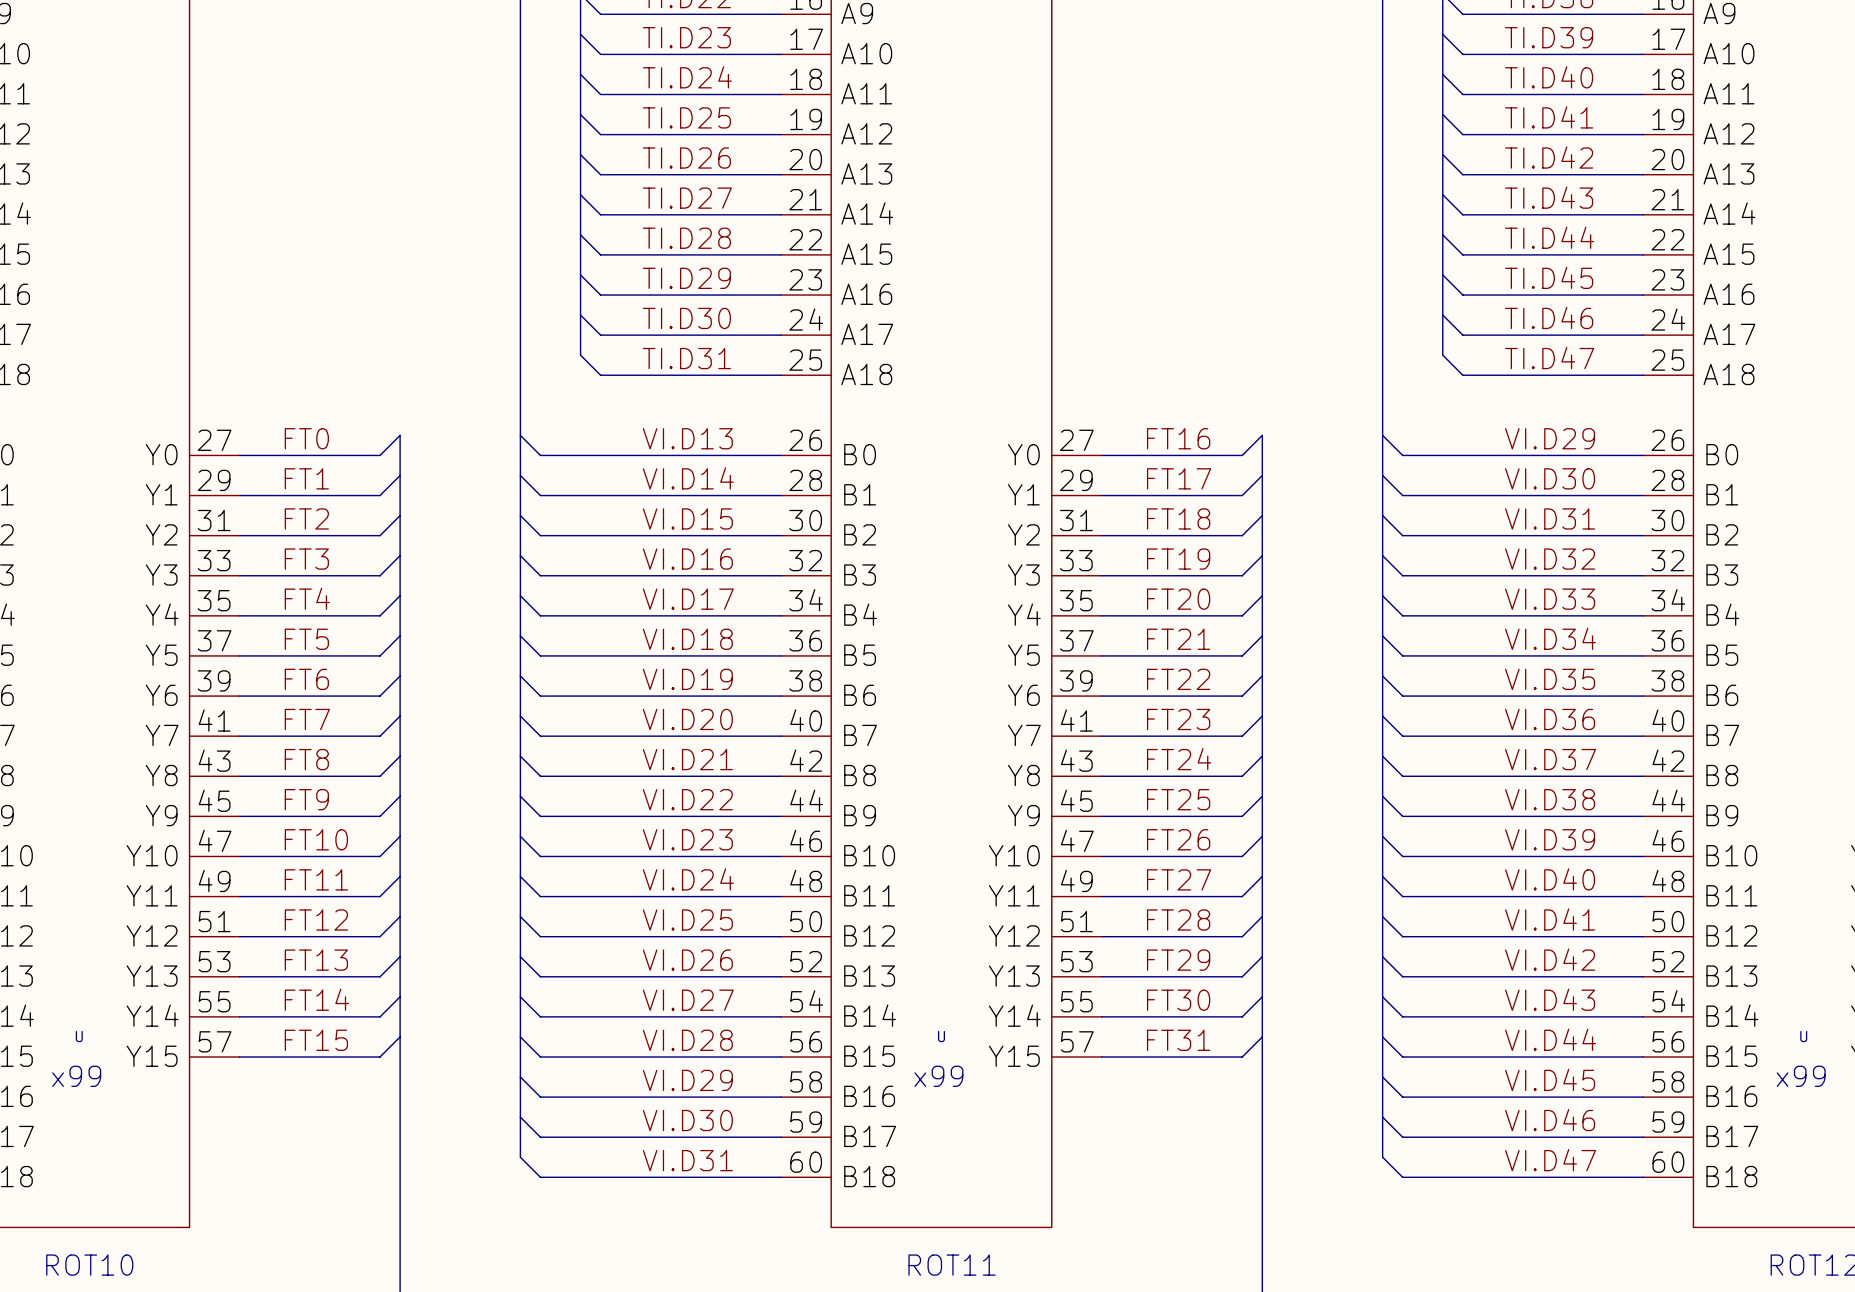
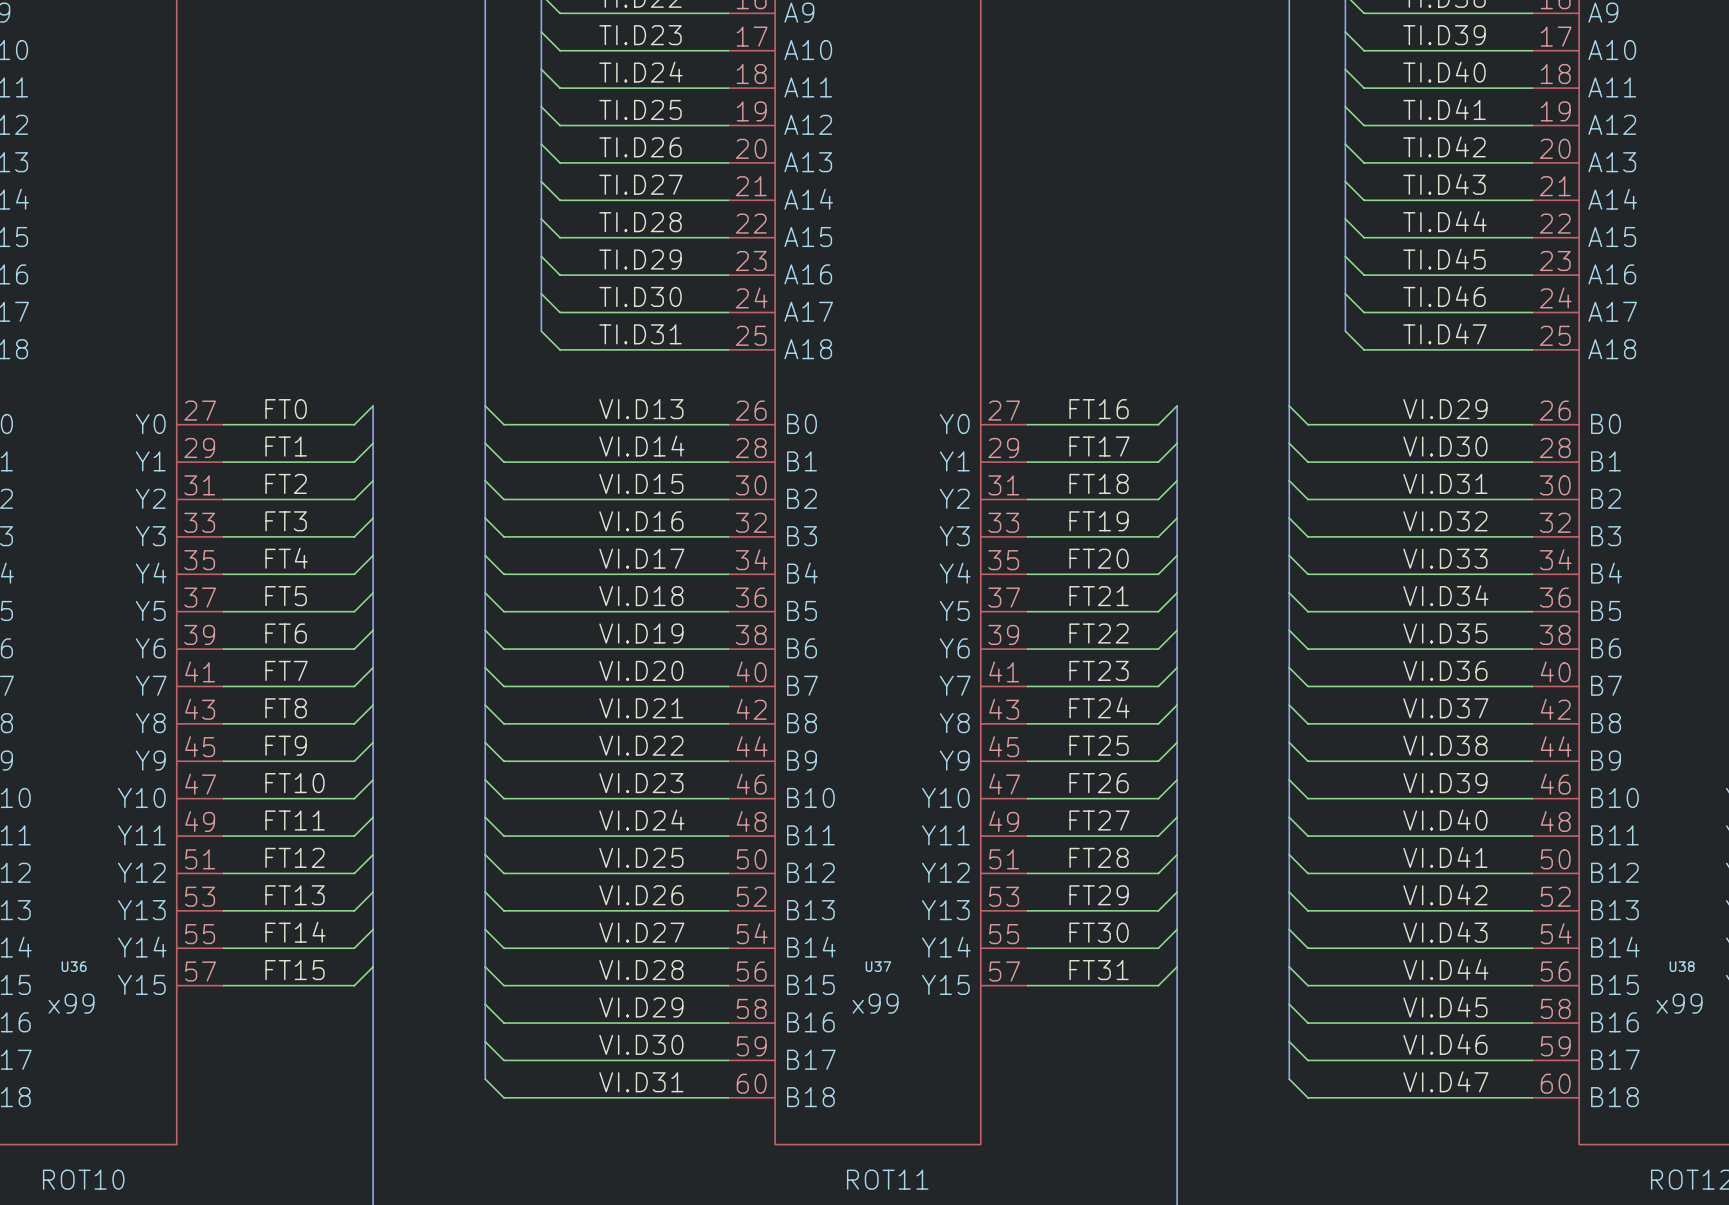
U name: U (79, 1036) -> U36 (74, 966)
U name: U (941, 1036) -> U37 (878, 966)
U name: U (1803, 1036) -> U38 (1682, 966)

